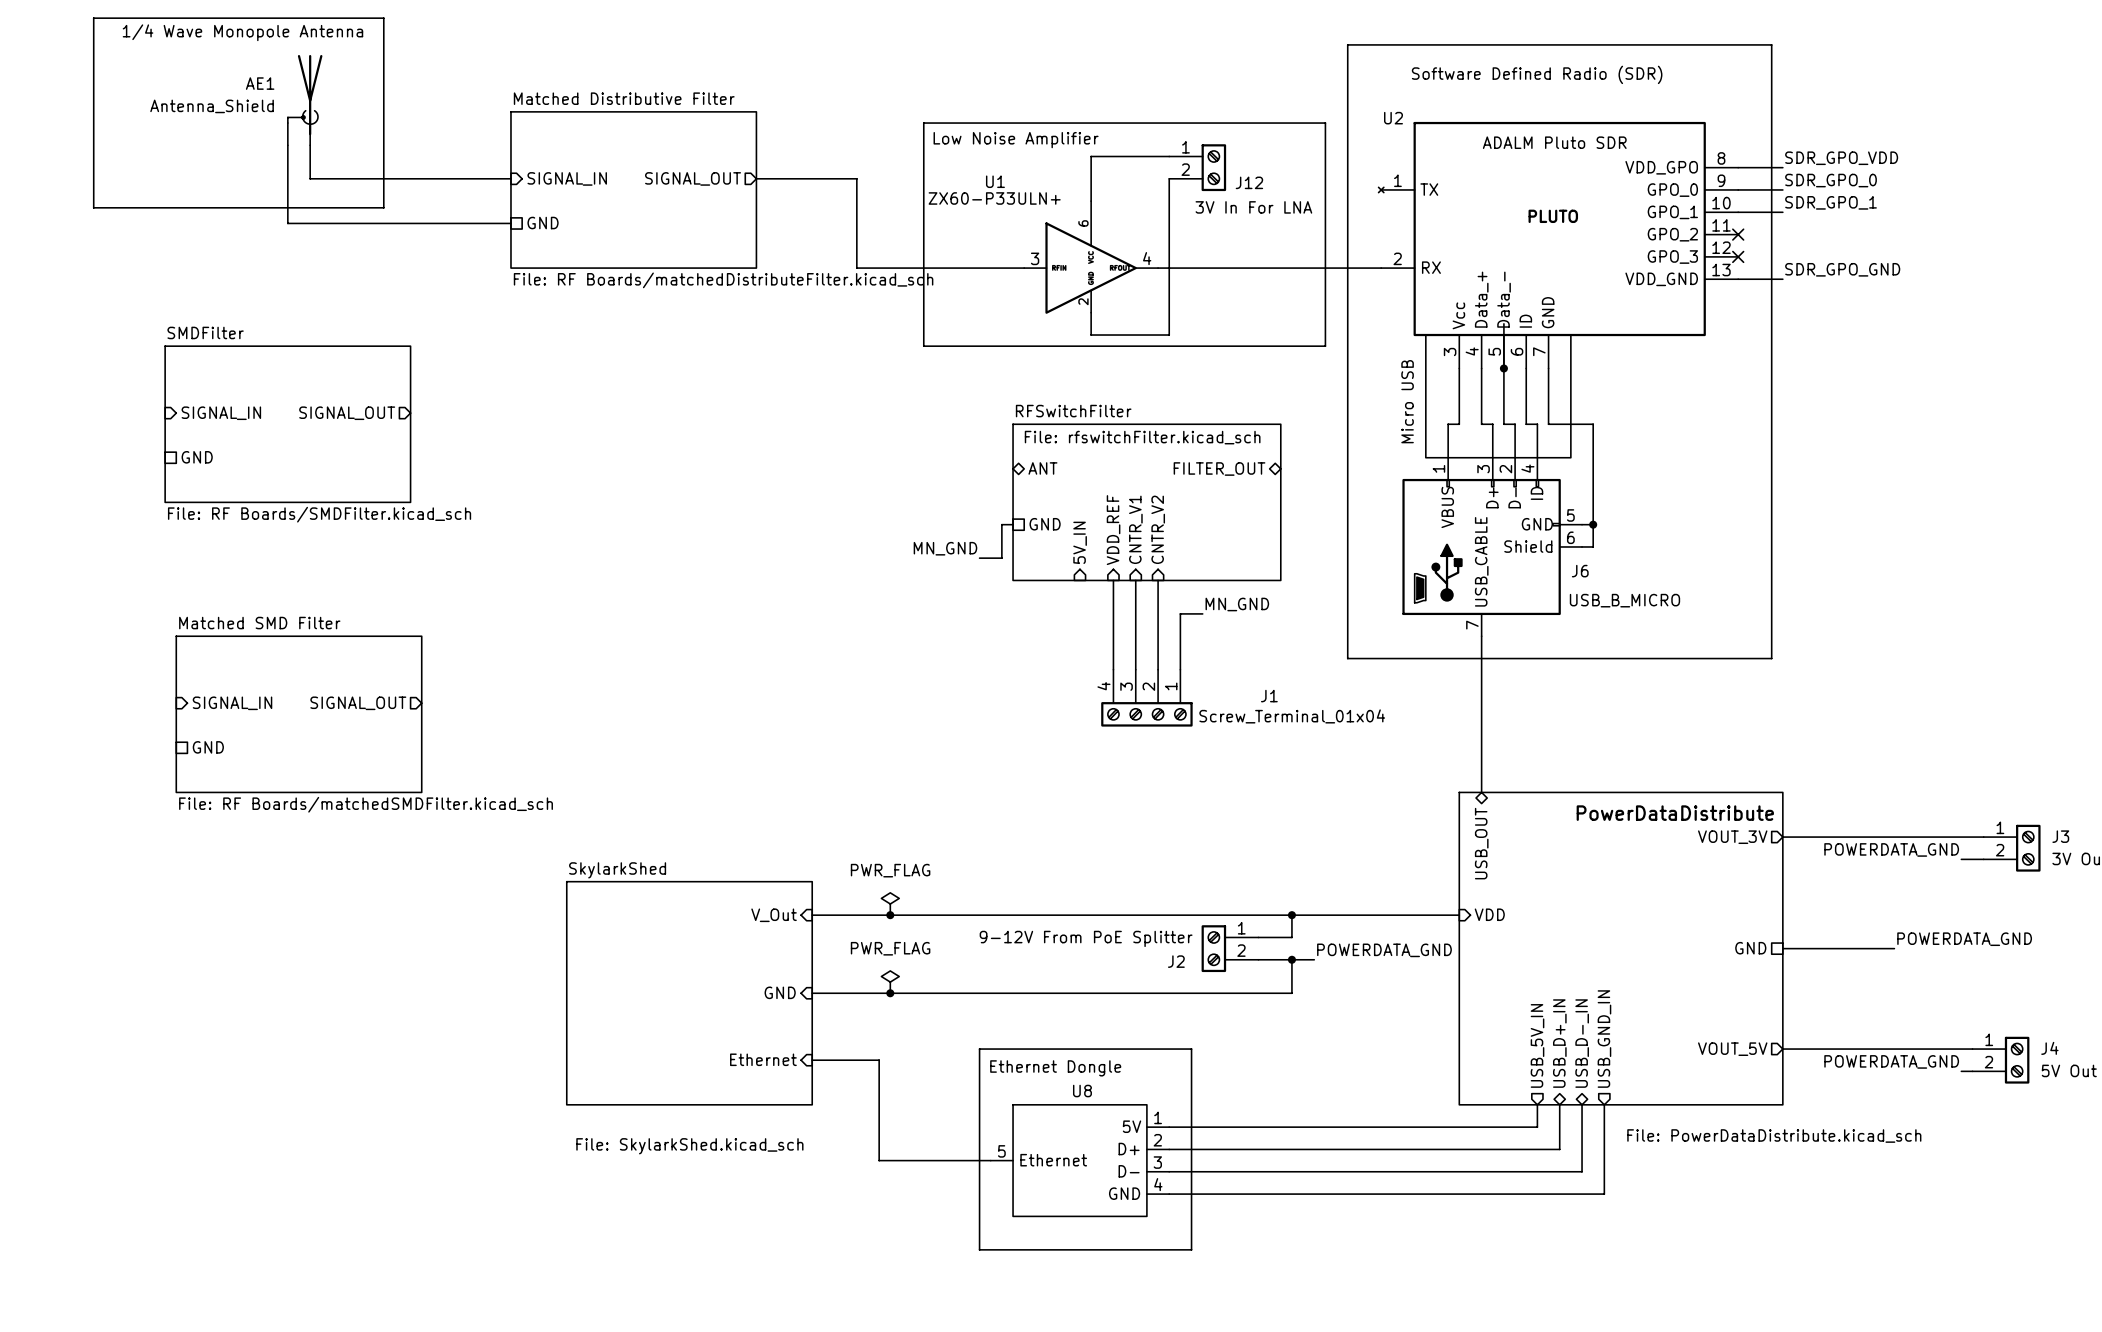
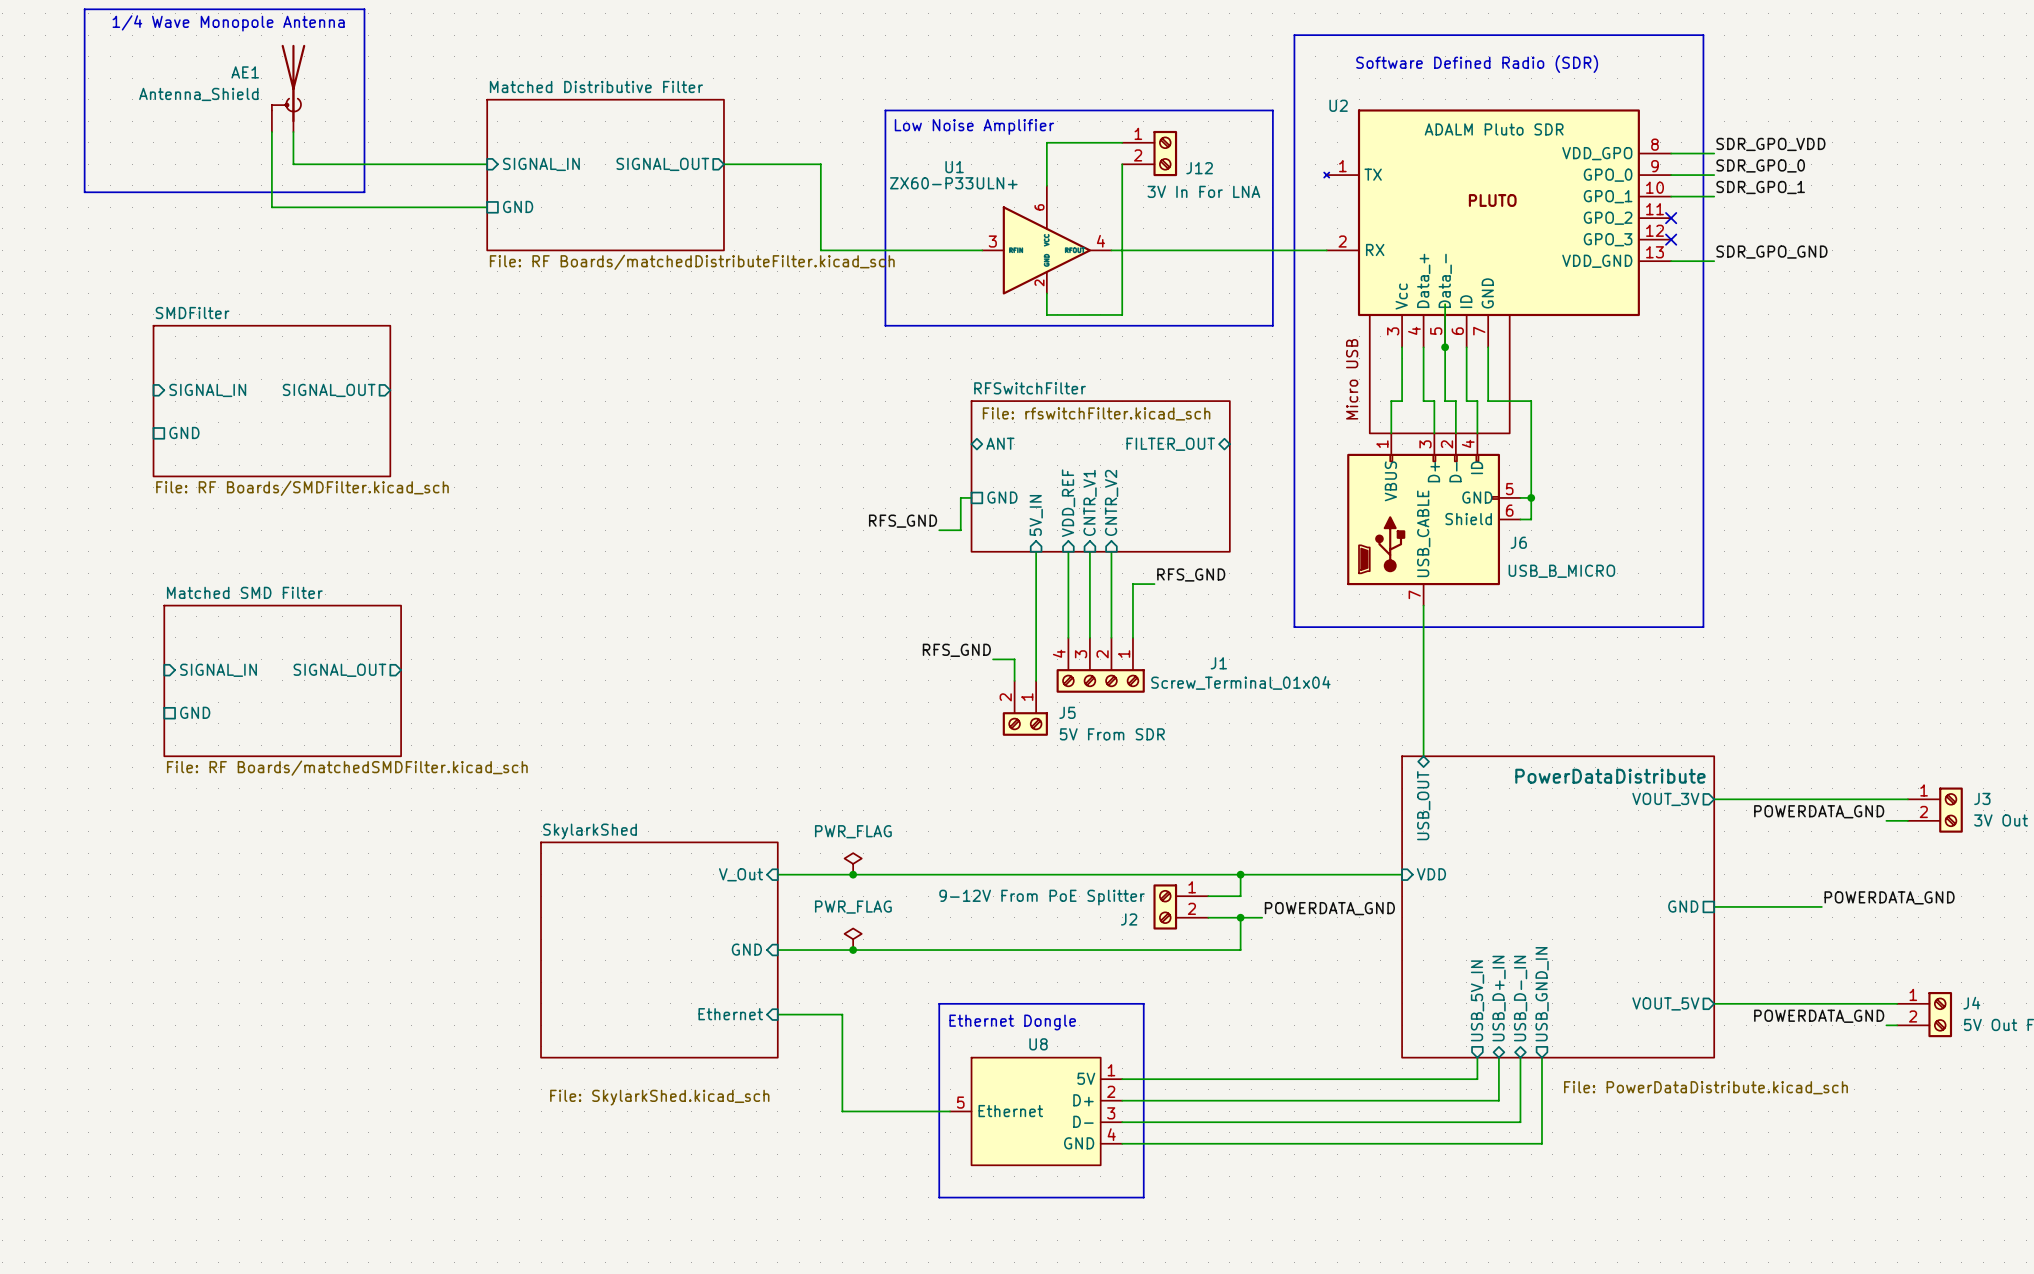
label: MN_GND (945, 548) -> RFS_GND (903, 521)
wire: none -> (1036, 551) (1036, 680)
label: MN_GND (1237, 604) -> RFS_GND (1191, 574)
label: none -> RFS_GND (956, 650)
wire: none -> (993, 659) (1014, 659) (1014, 680)
J5: none -> 5V From SDR (1025, 708)

